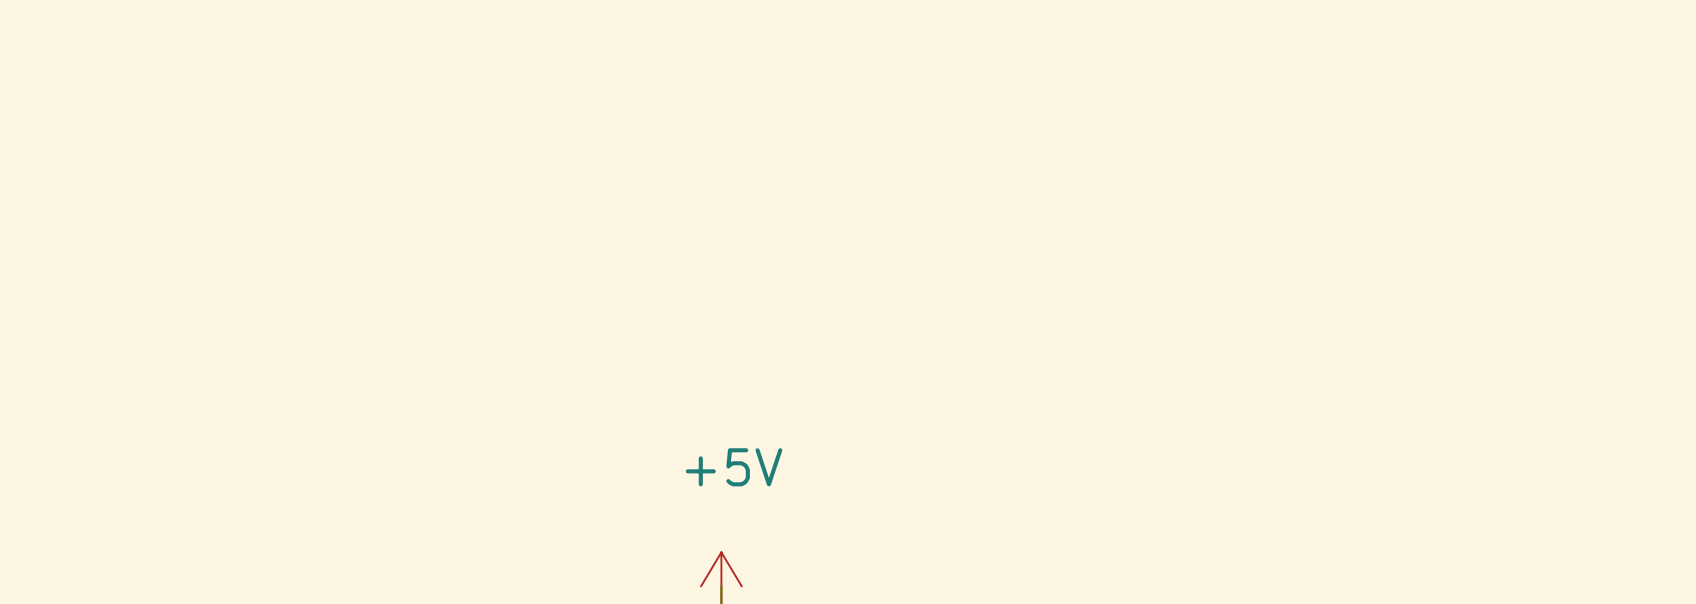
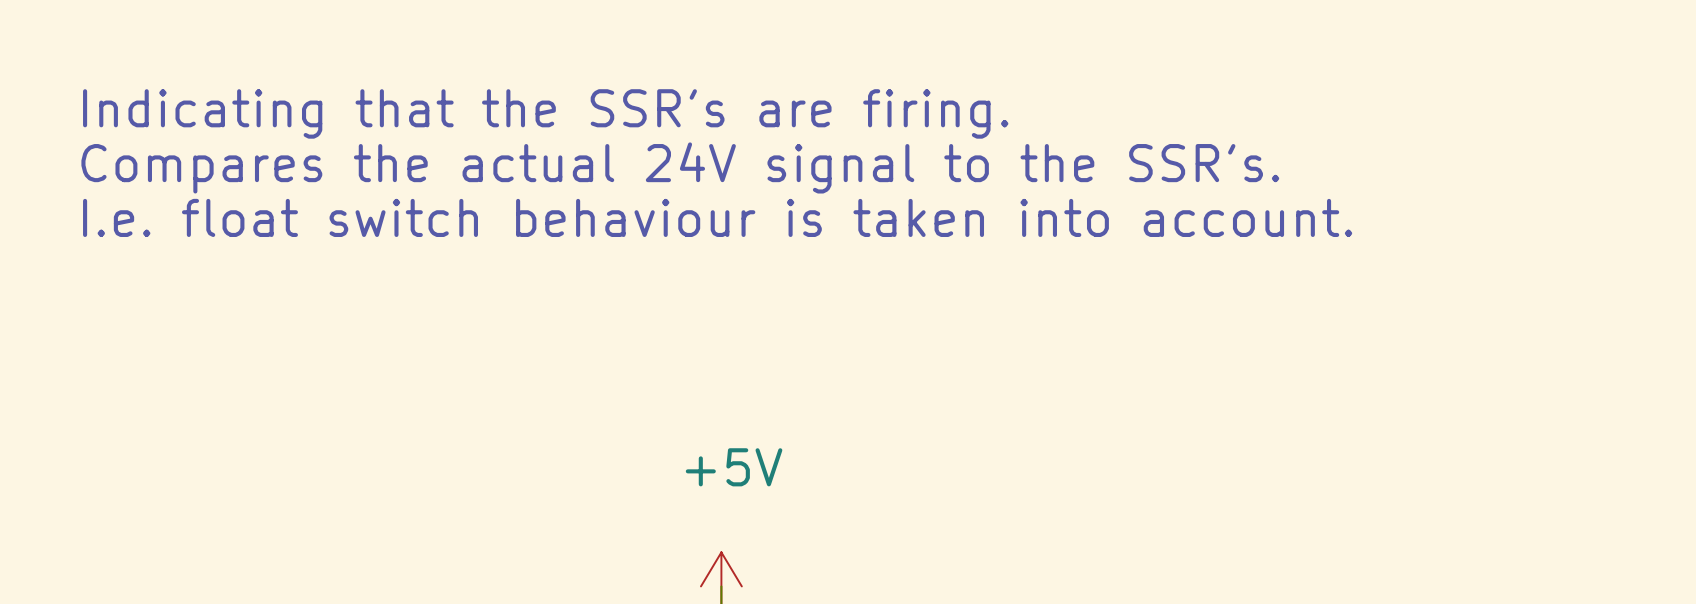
text: none -> Indicating that the SSR's are firing. (545, 113)
text: none -> Compares the actual 24V signal to the SSR's. (680, 167)
text: none -> I.e. float switch behaviour is taken into account. (717, 217)

